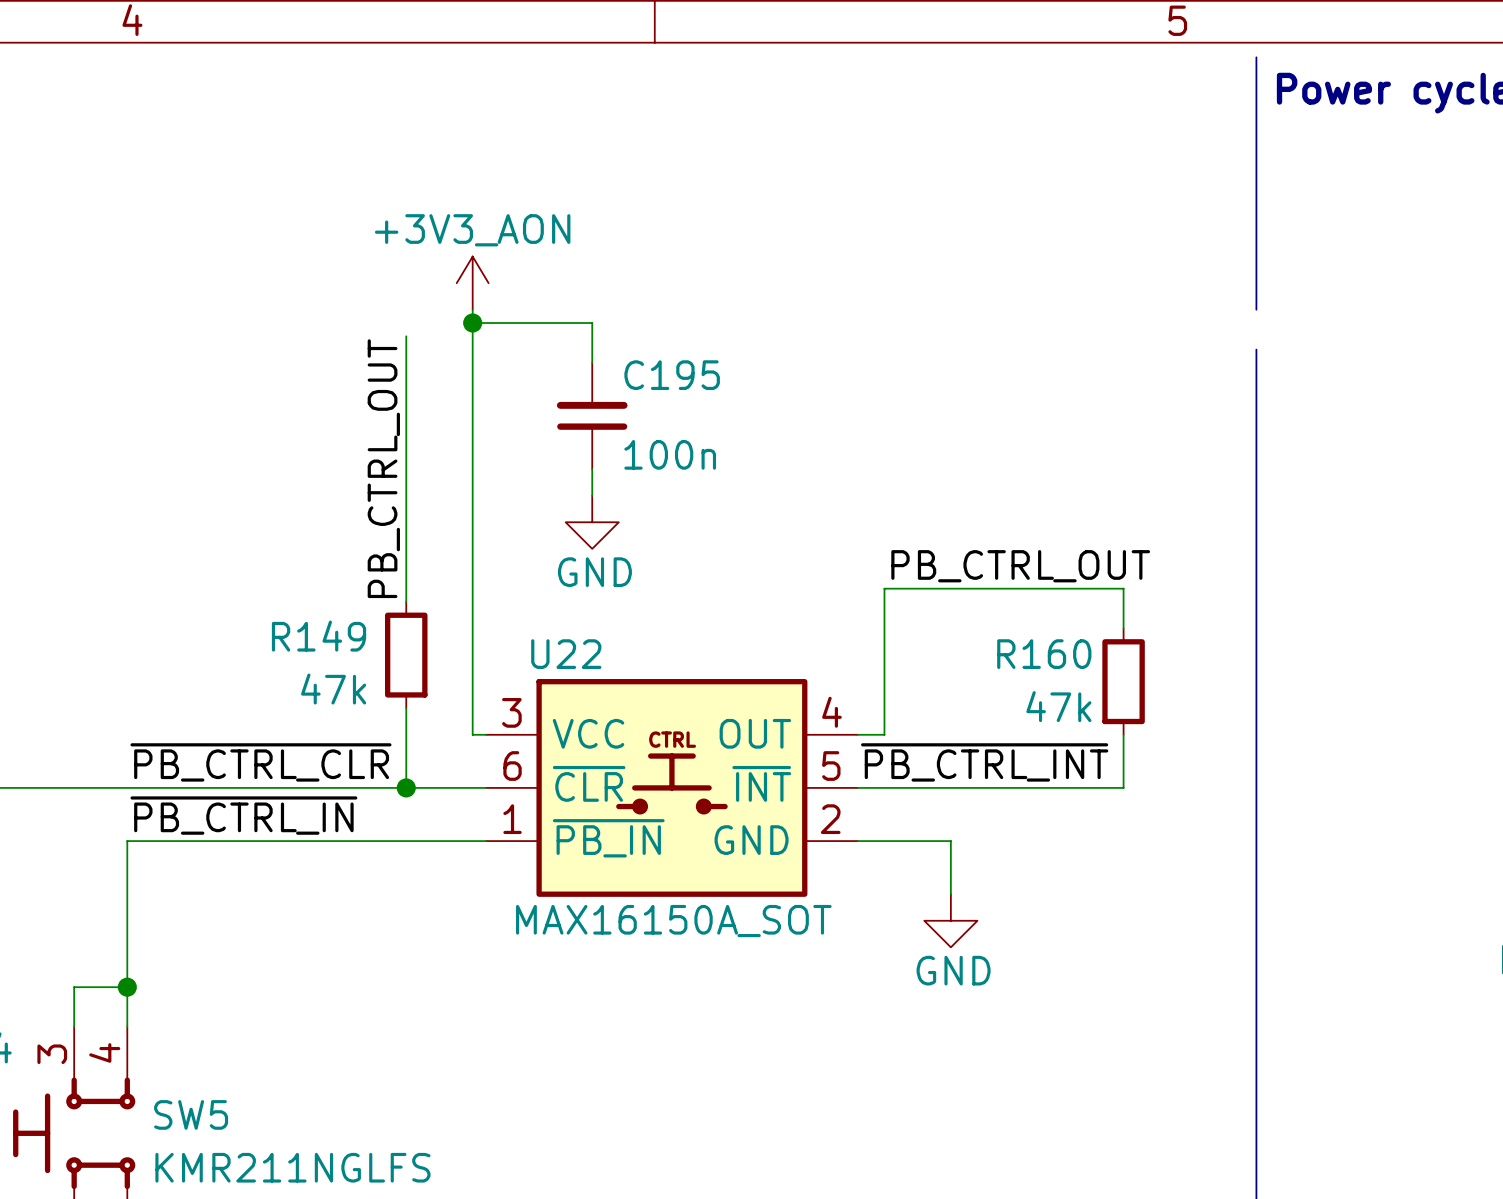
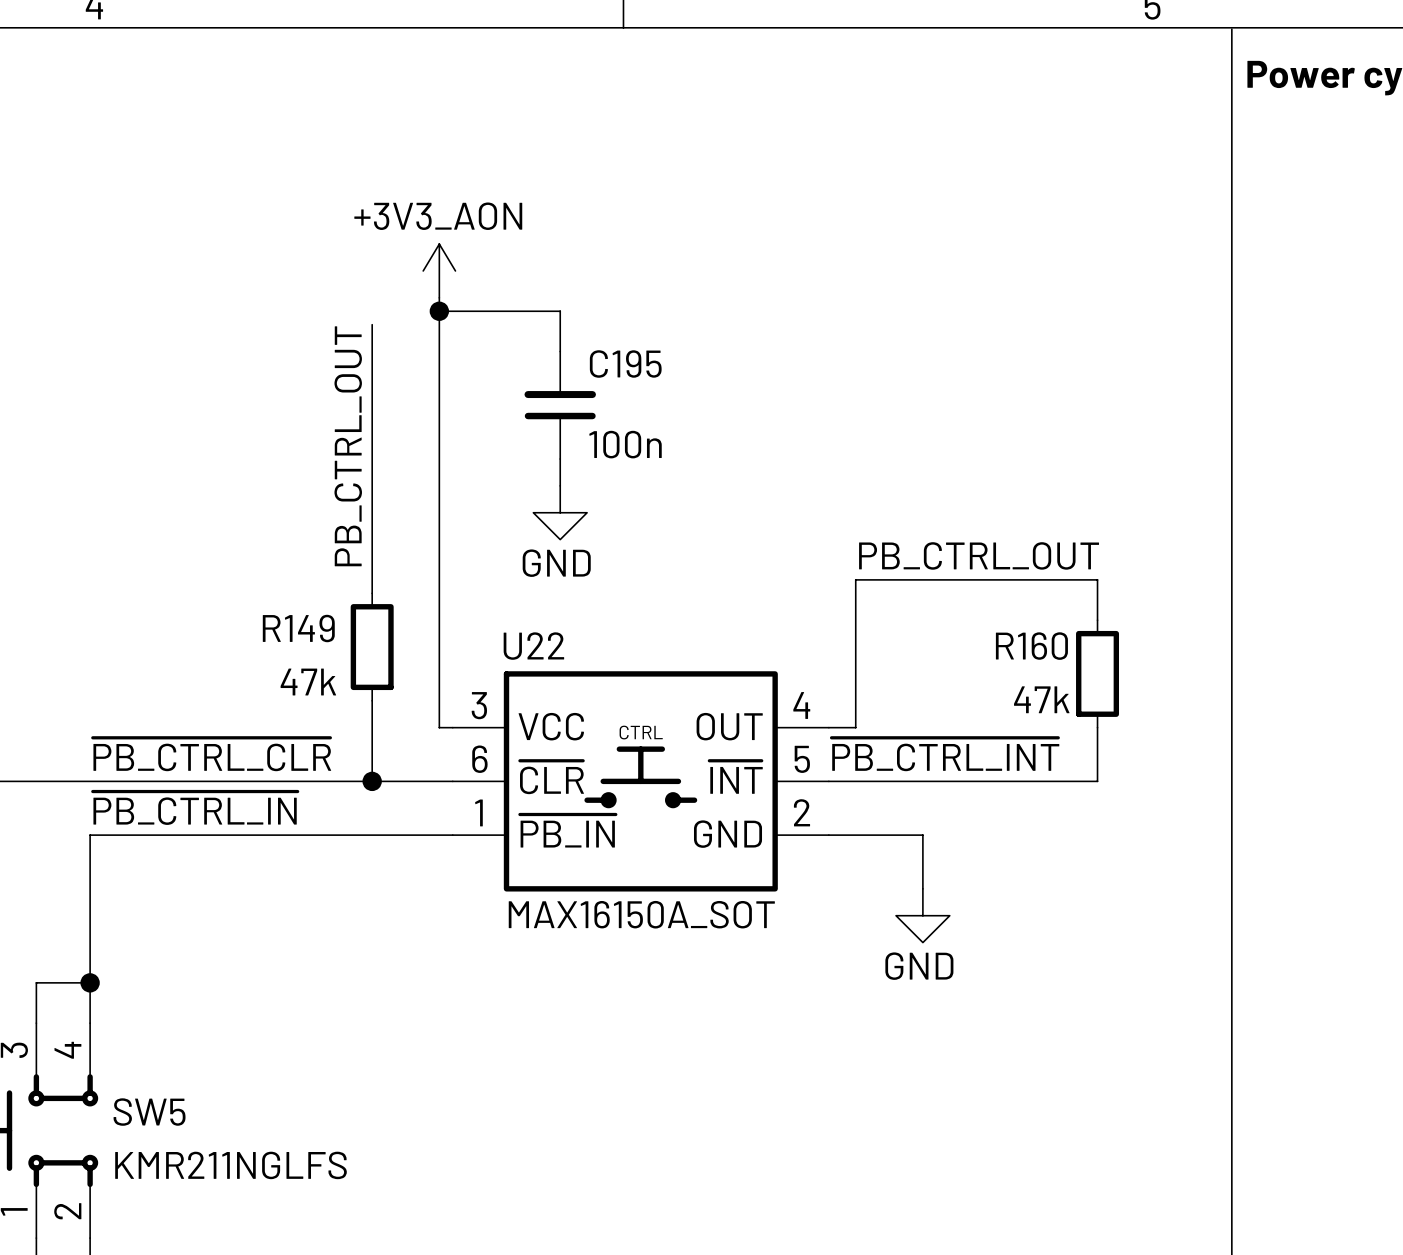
line: none -> (1231, 29) (1231, 42)
line: none -> (1231, 297) (1231, 338)

